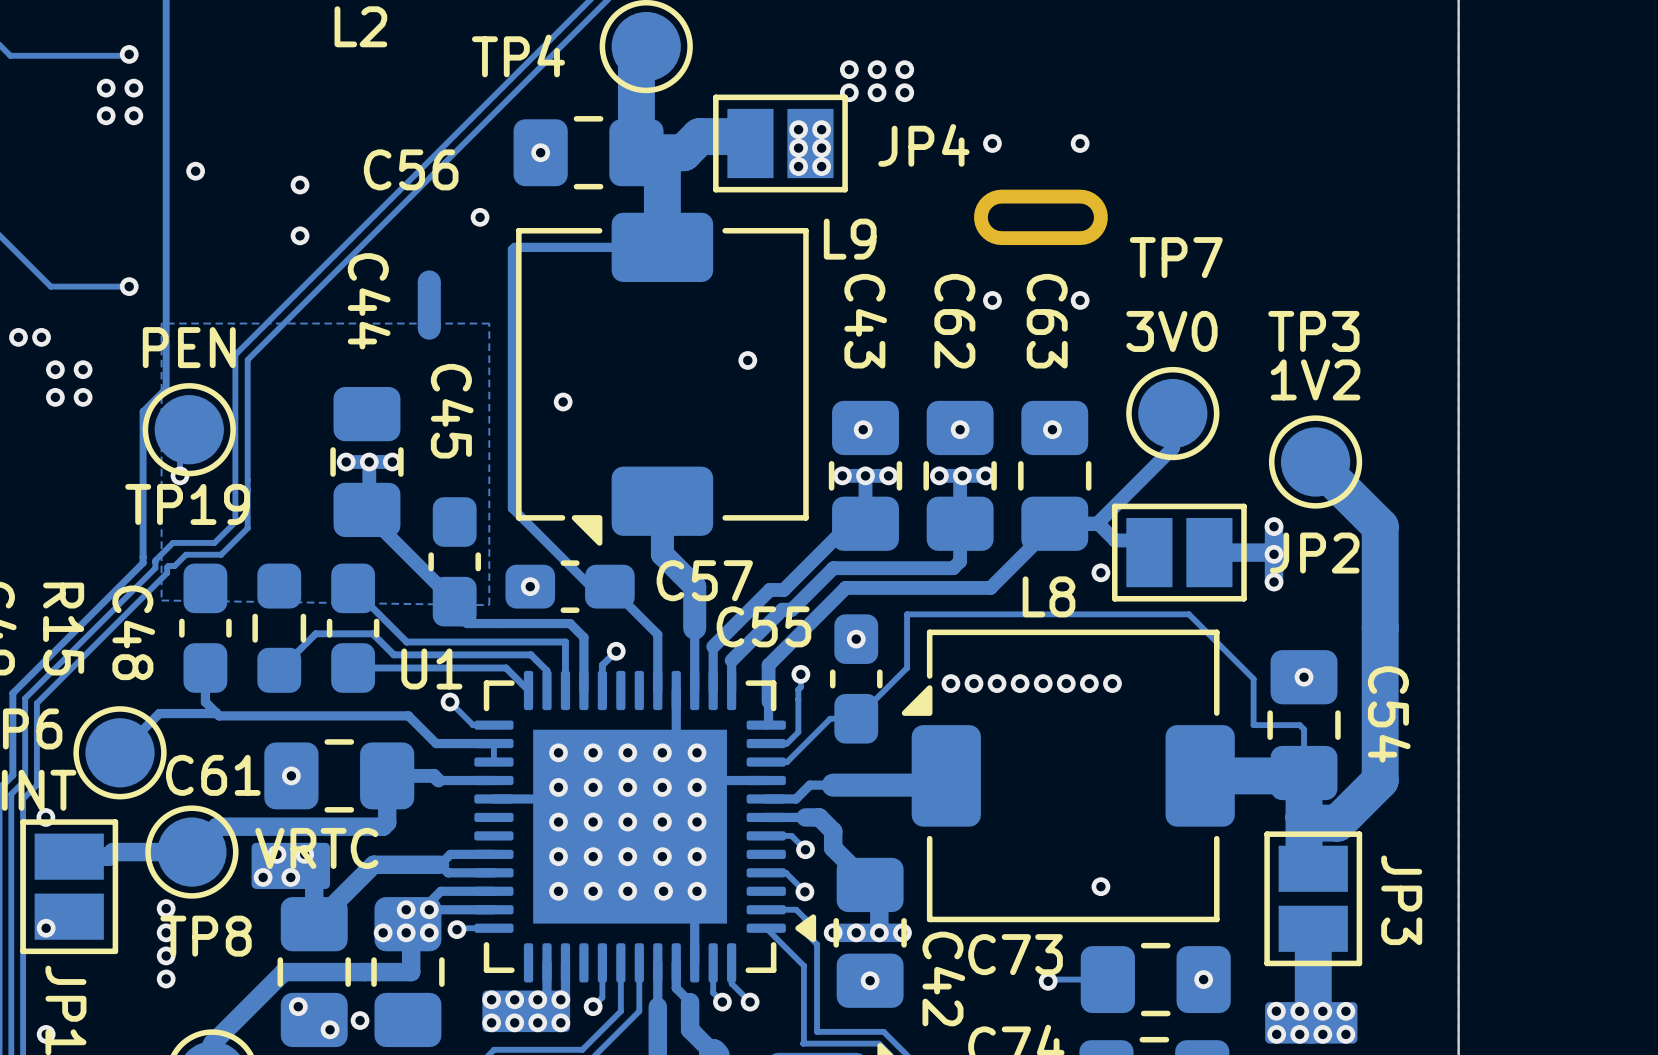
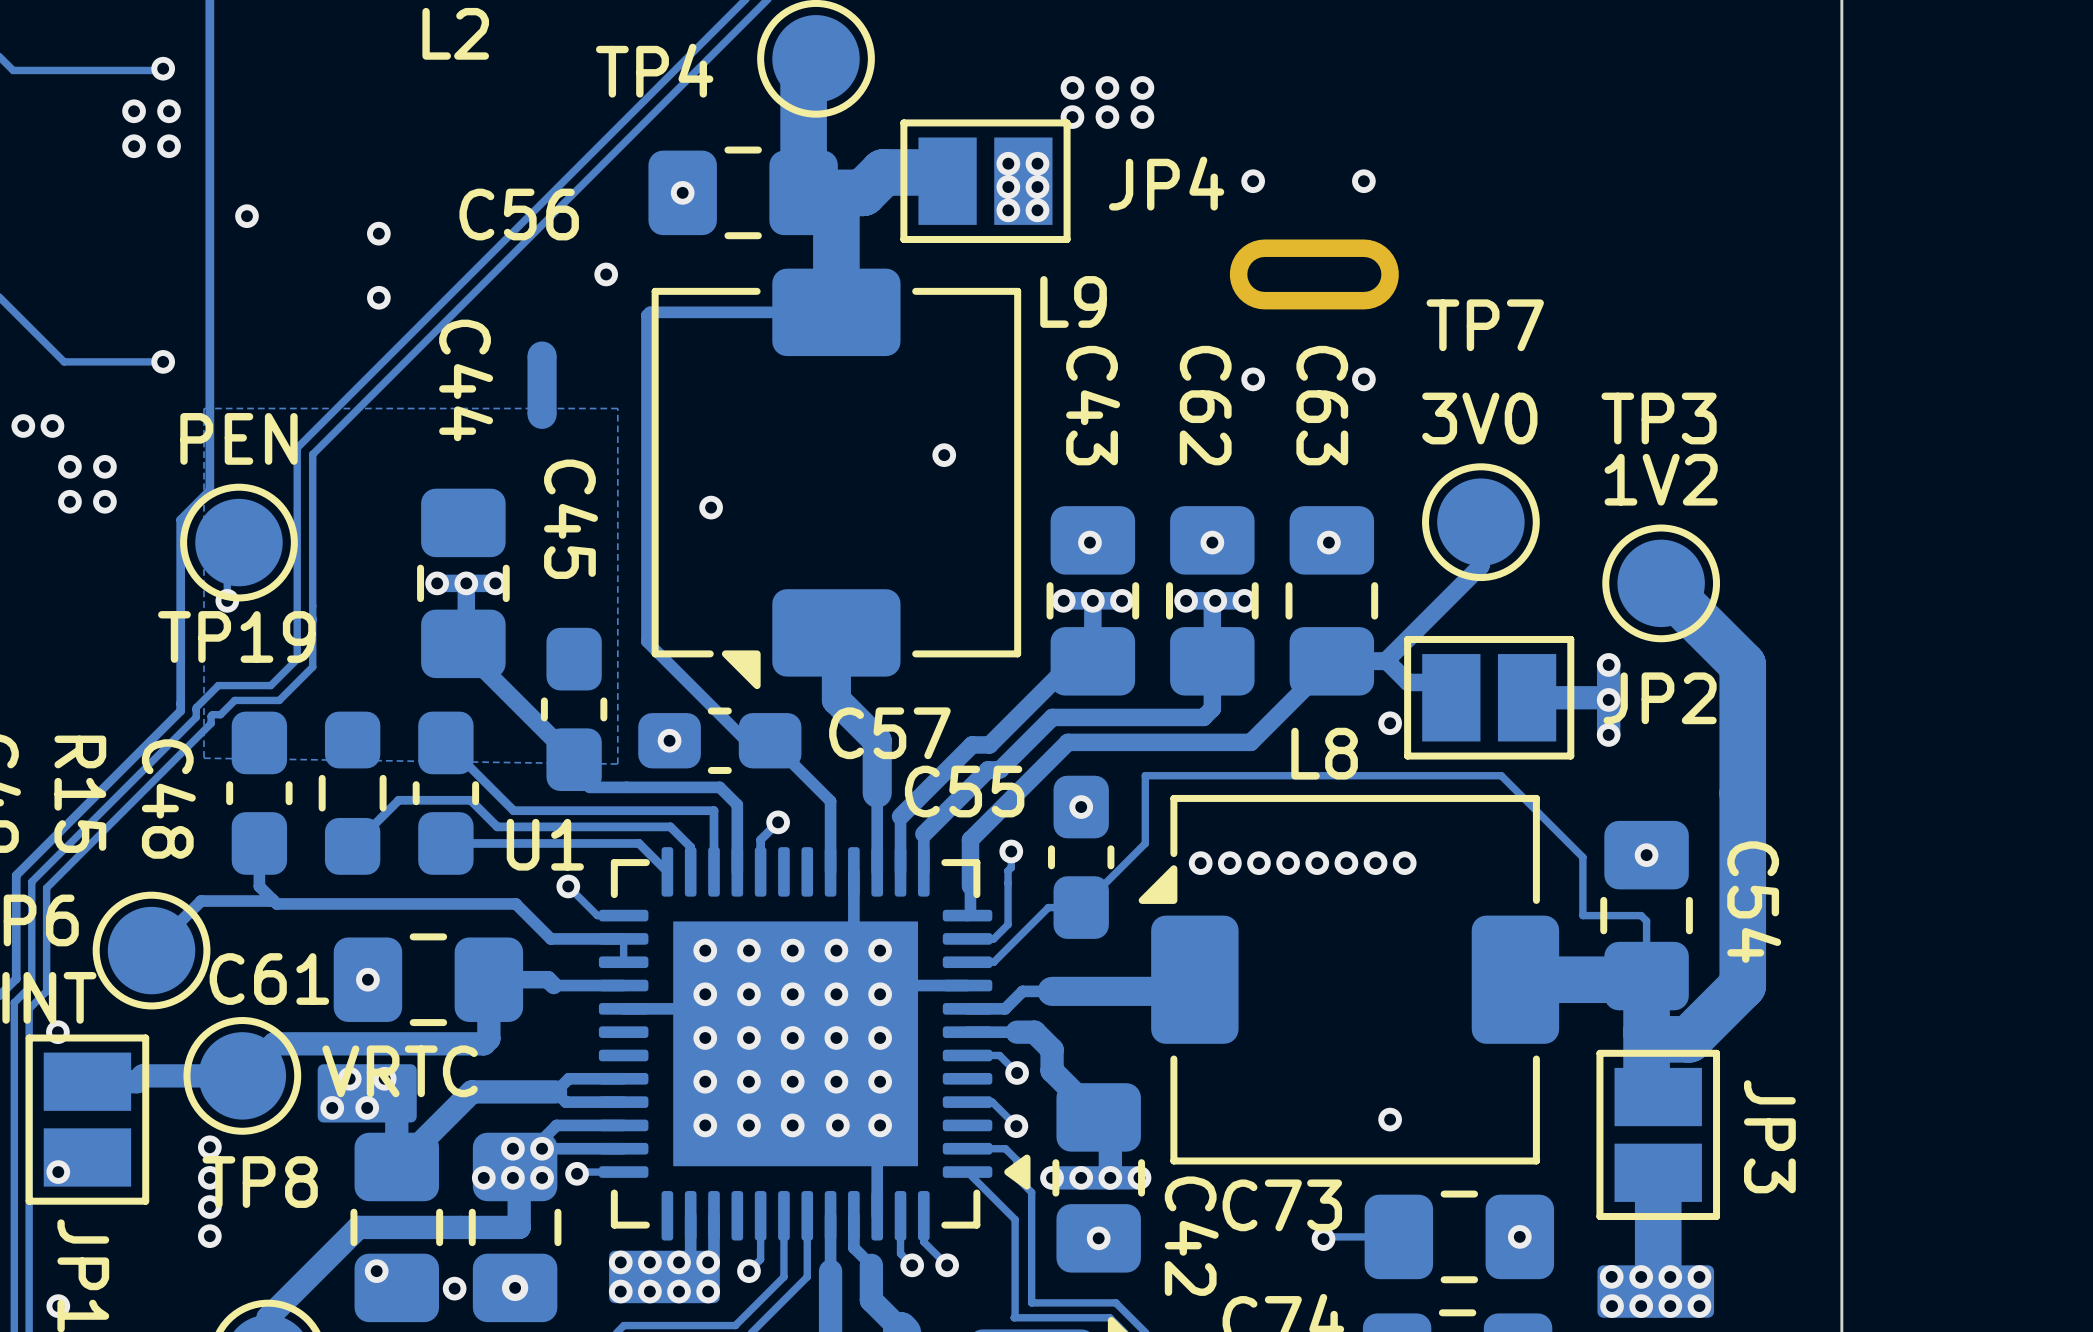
via: none -> (515, 1287)
via: (330, 1029) -> none

